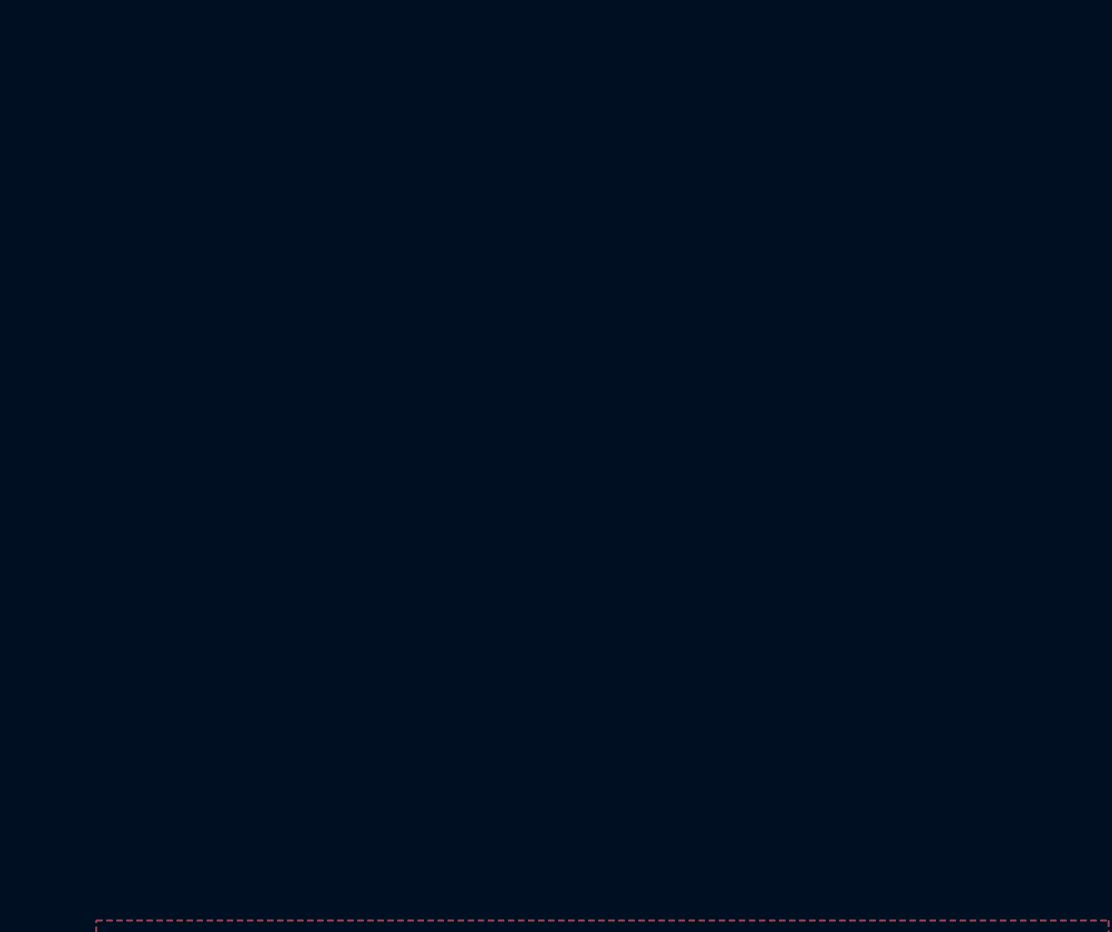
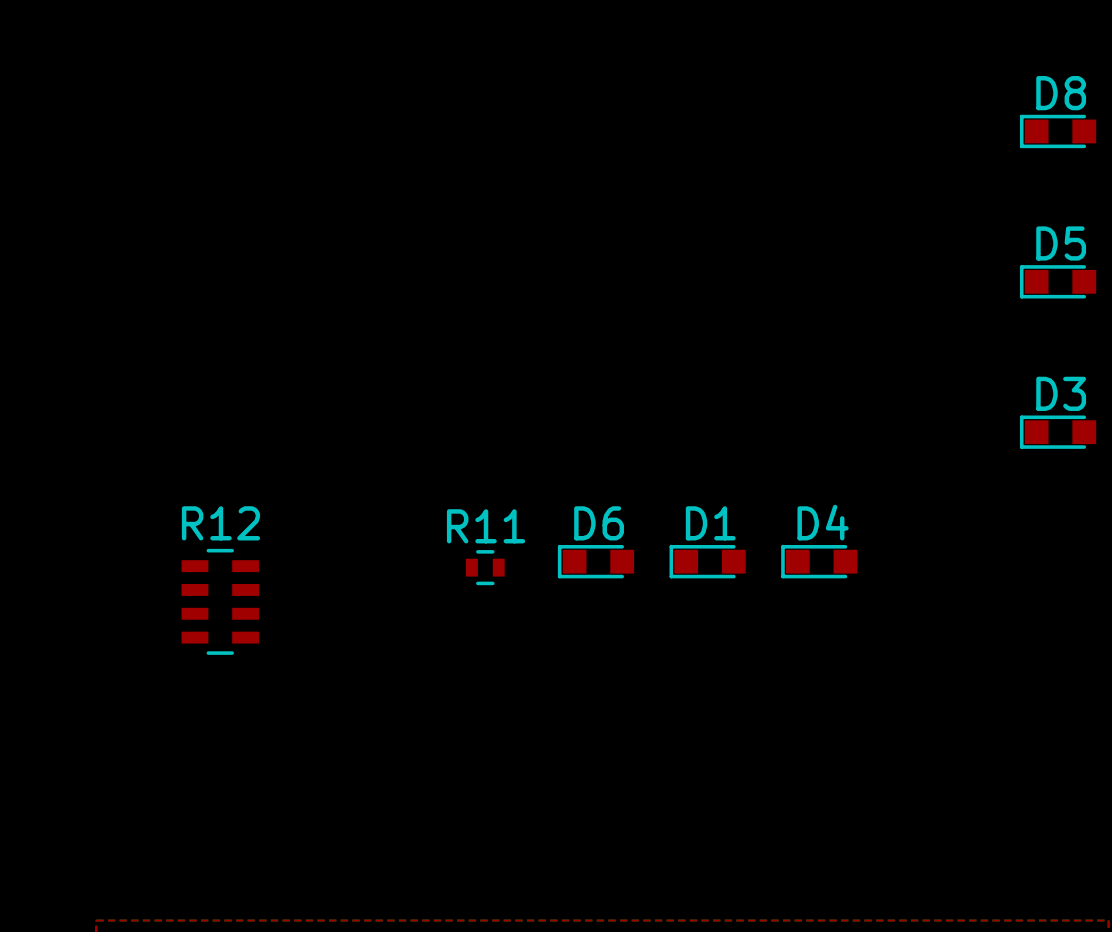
D8: none -> (1058, 131)
D5: none -> (1058, 281)
D3: none -> (1058, 432)
D6: none -> (595, 561)
D1: none -> (707, 561)
D4: none -> (819, 561)
R11: none -> (485, 567)
R12: none -> (220, 601)

